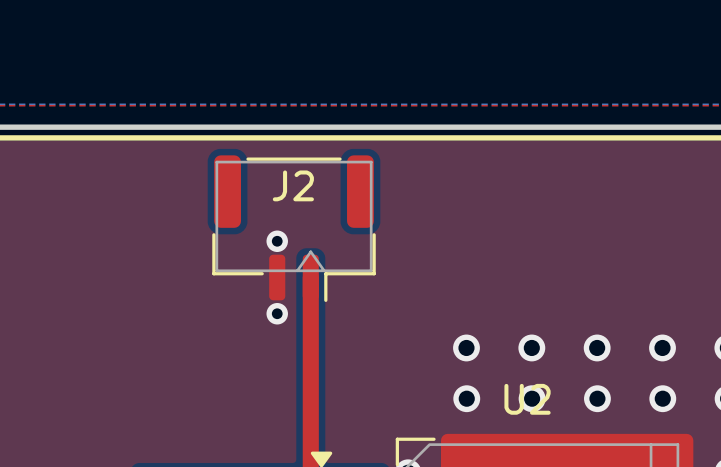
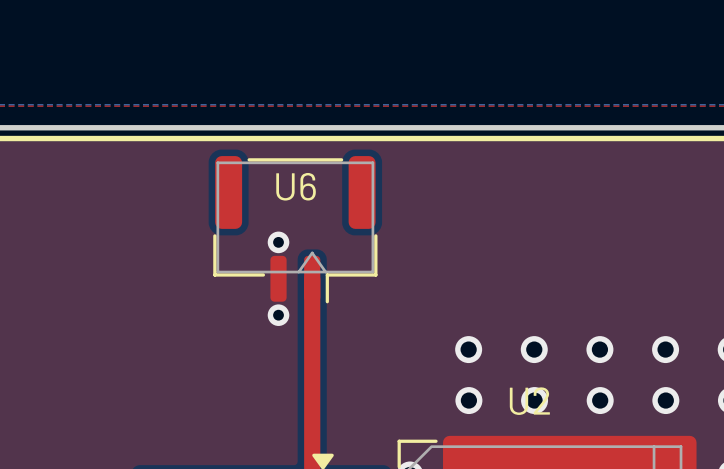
J2 name: J2 (293, 185) -> U6 (296, 186)

